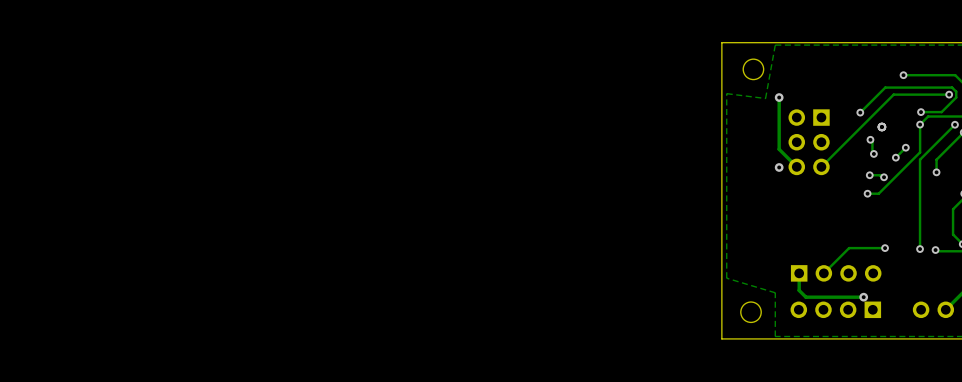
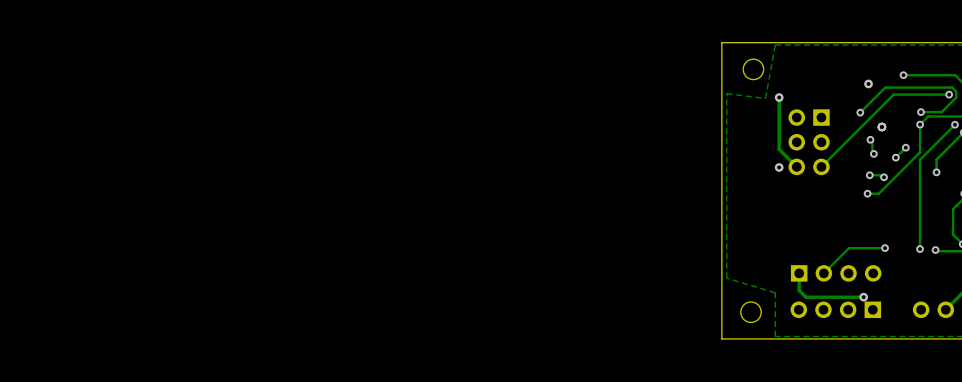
via: none -> (868, 83)

